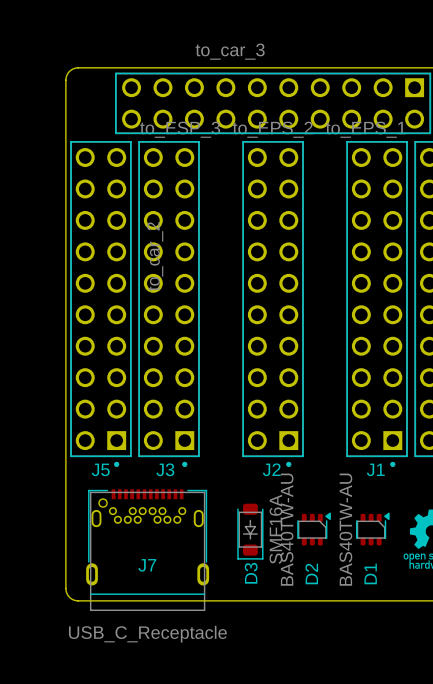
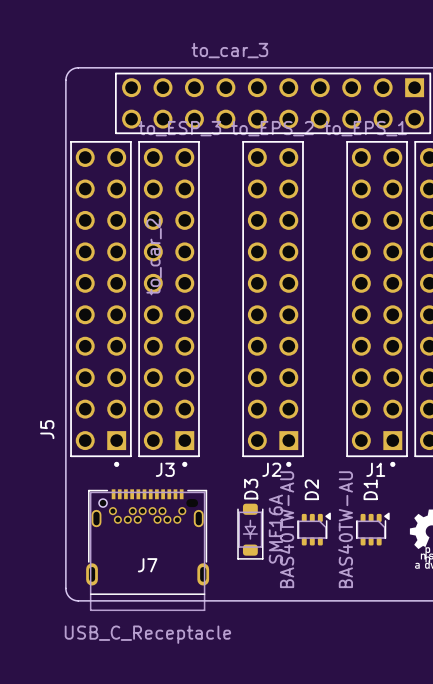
J5 name rotation: 0° (100, 469) -> 90° counterclockwise (47, 429)
J5 name position: J5 (100, 469) -> J5 (47, 429)
drawing: [403, 553, 426, 569] -> none
drawing position: (411, 561) -> (427, 554)
D3 name position: D3 (251, 573) -> D3 (251, 489)
D2 name position: D2 (311, 573) -> D2 (311, 489)
D1 name position: D1 (370, 573) -> D1 (370, 489)

